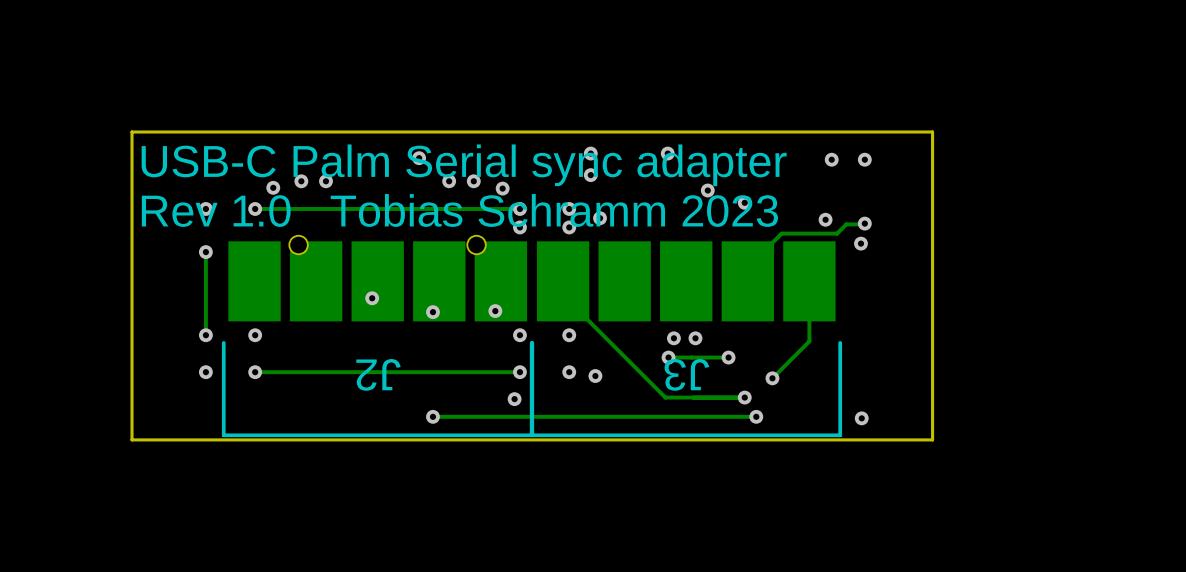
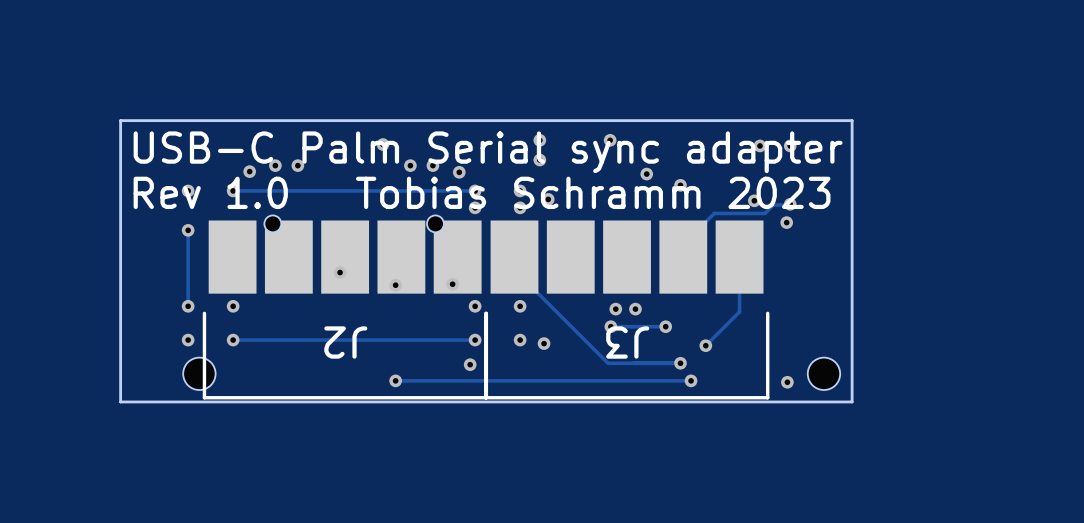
part: none -> (199, 373)
part: none -> (823, 373)

